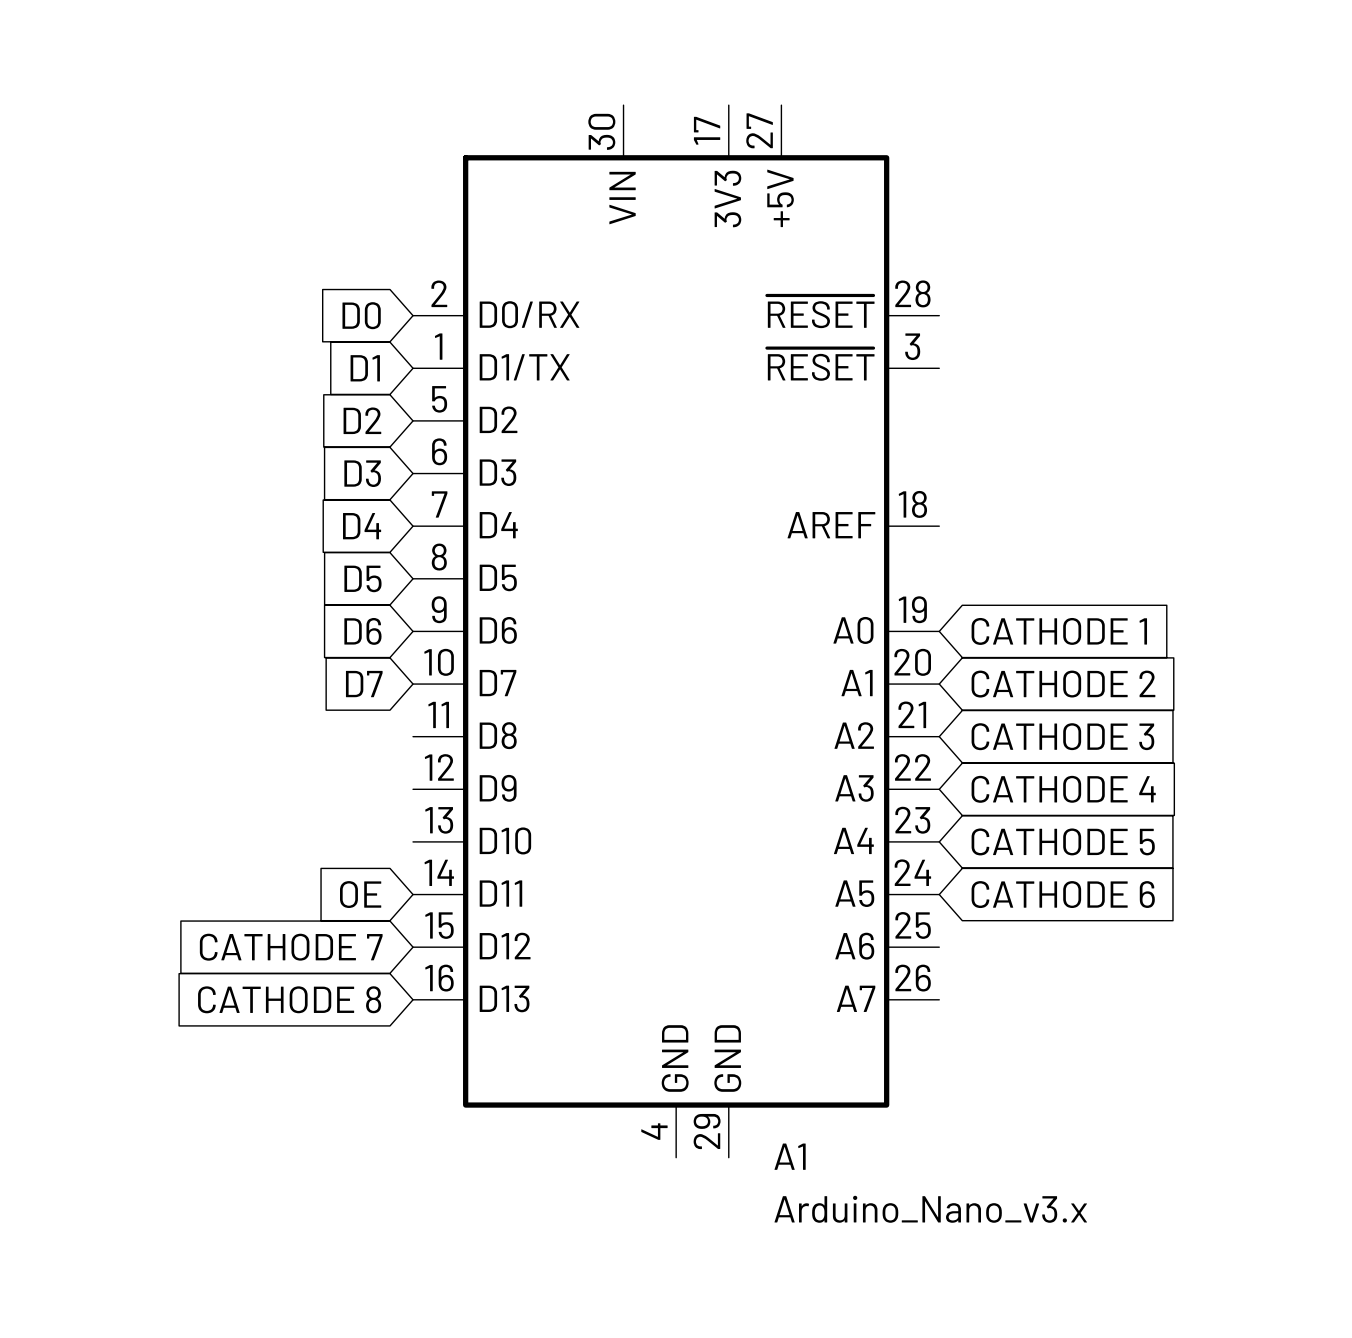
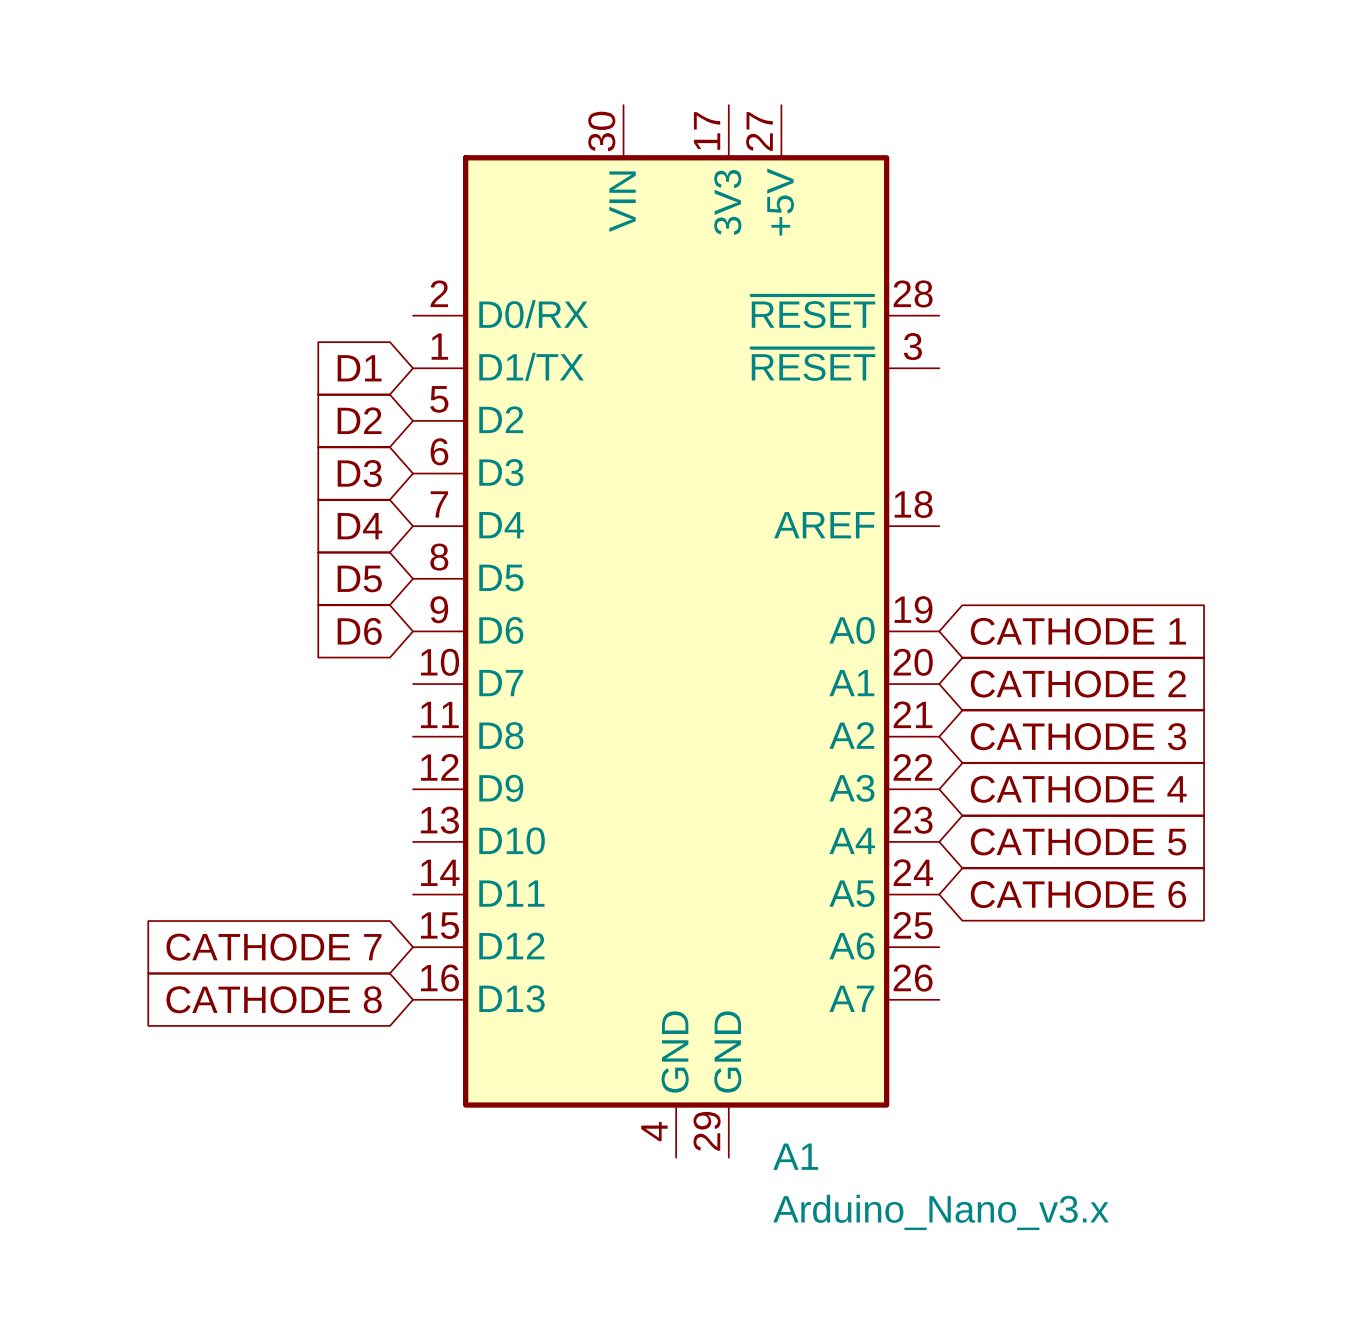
global label: D0 (361, 315) -> none
global label: D7 (364, 684) -> none
global label: OE (360, 894) -> none

